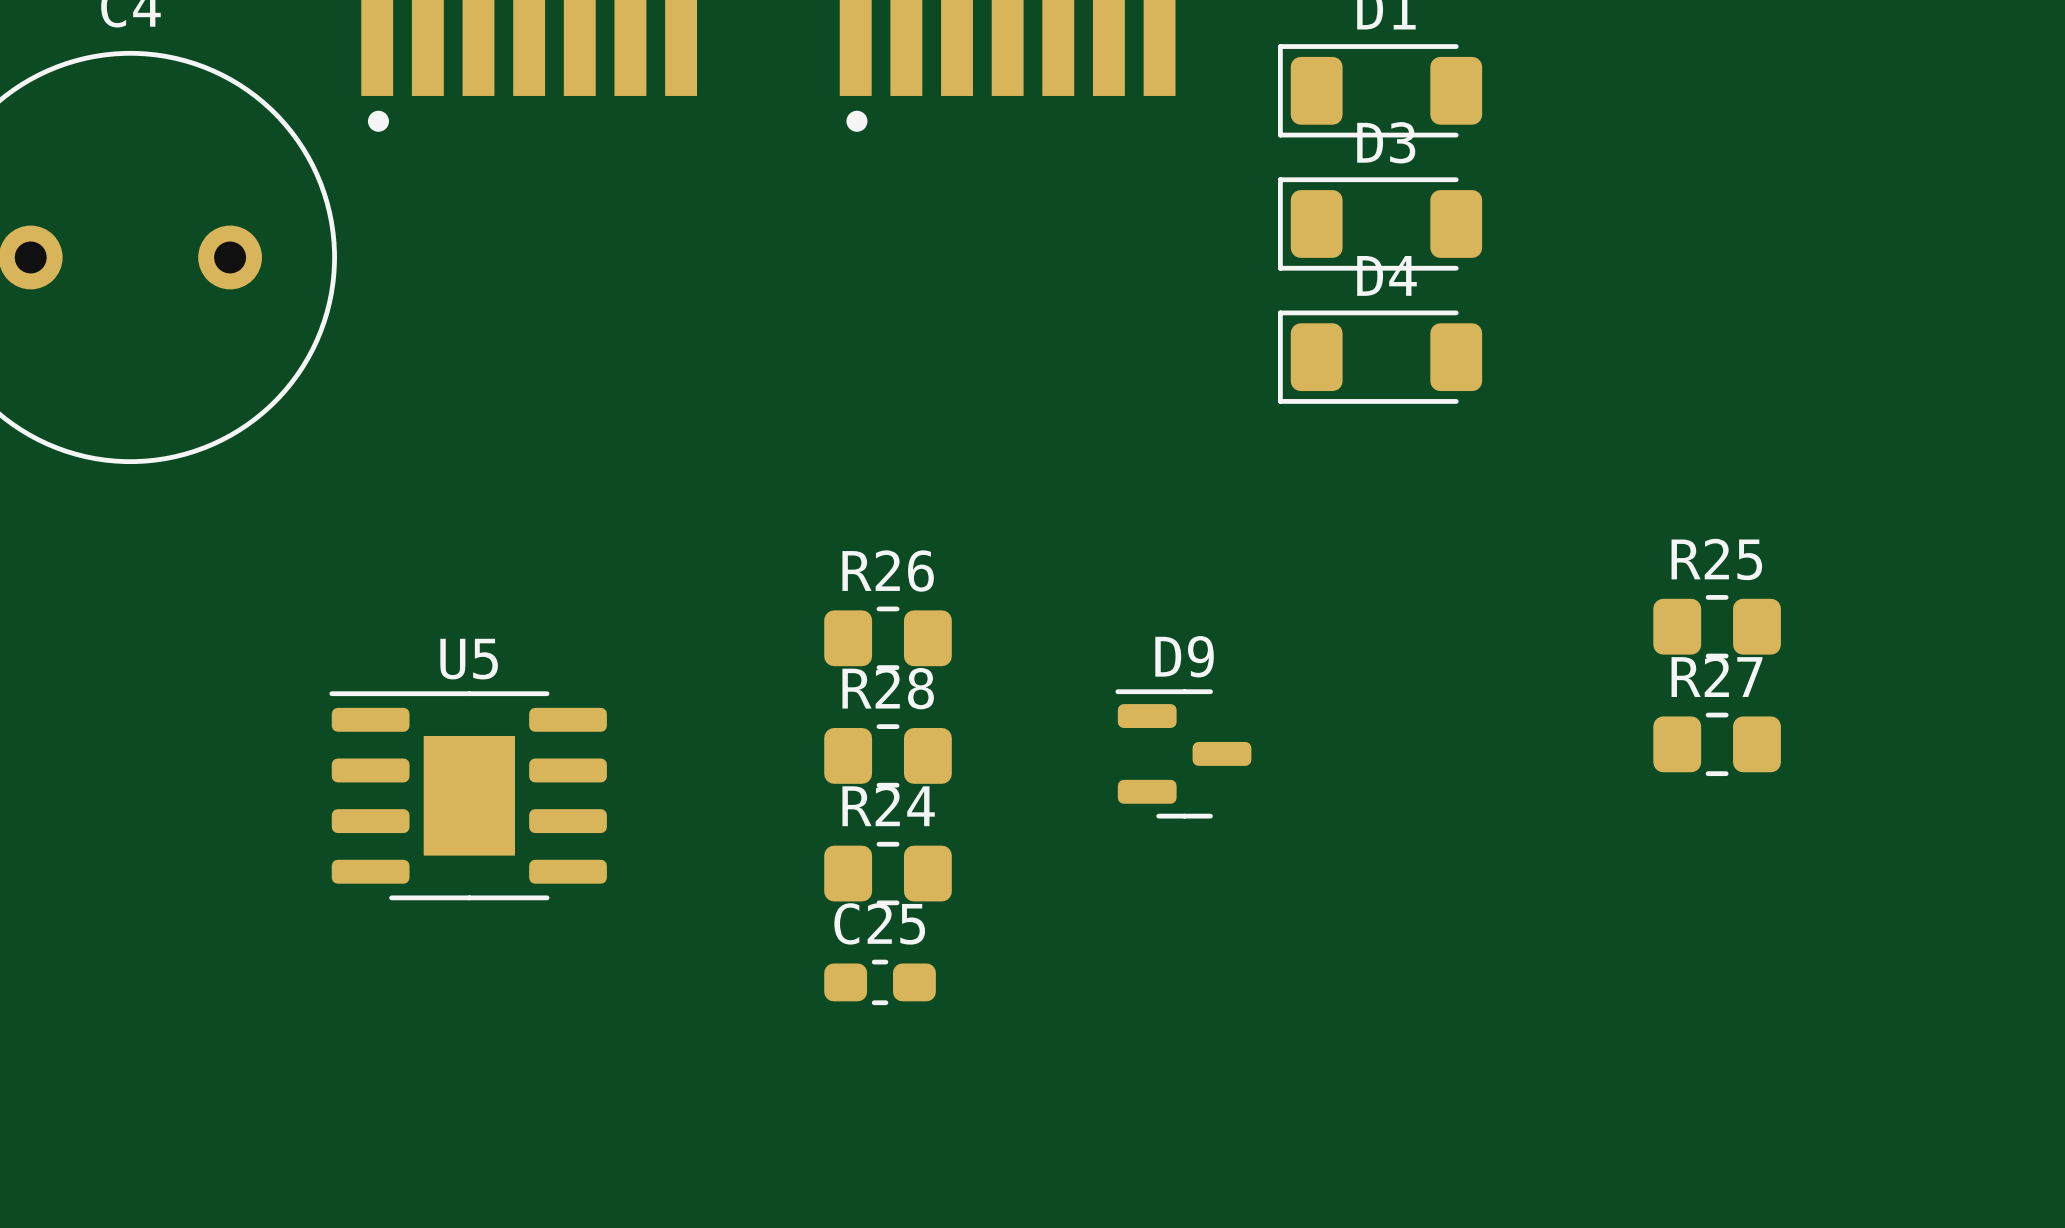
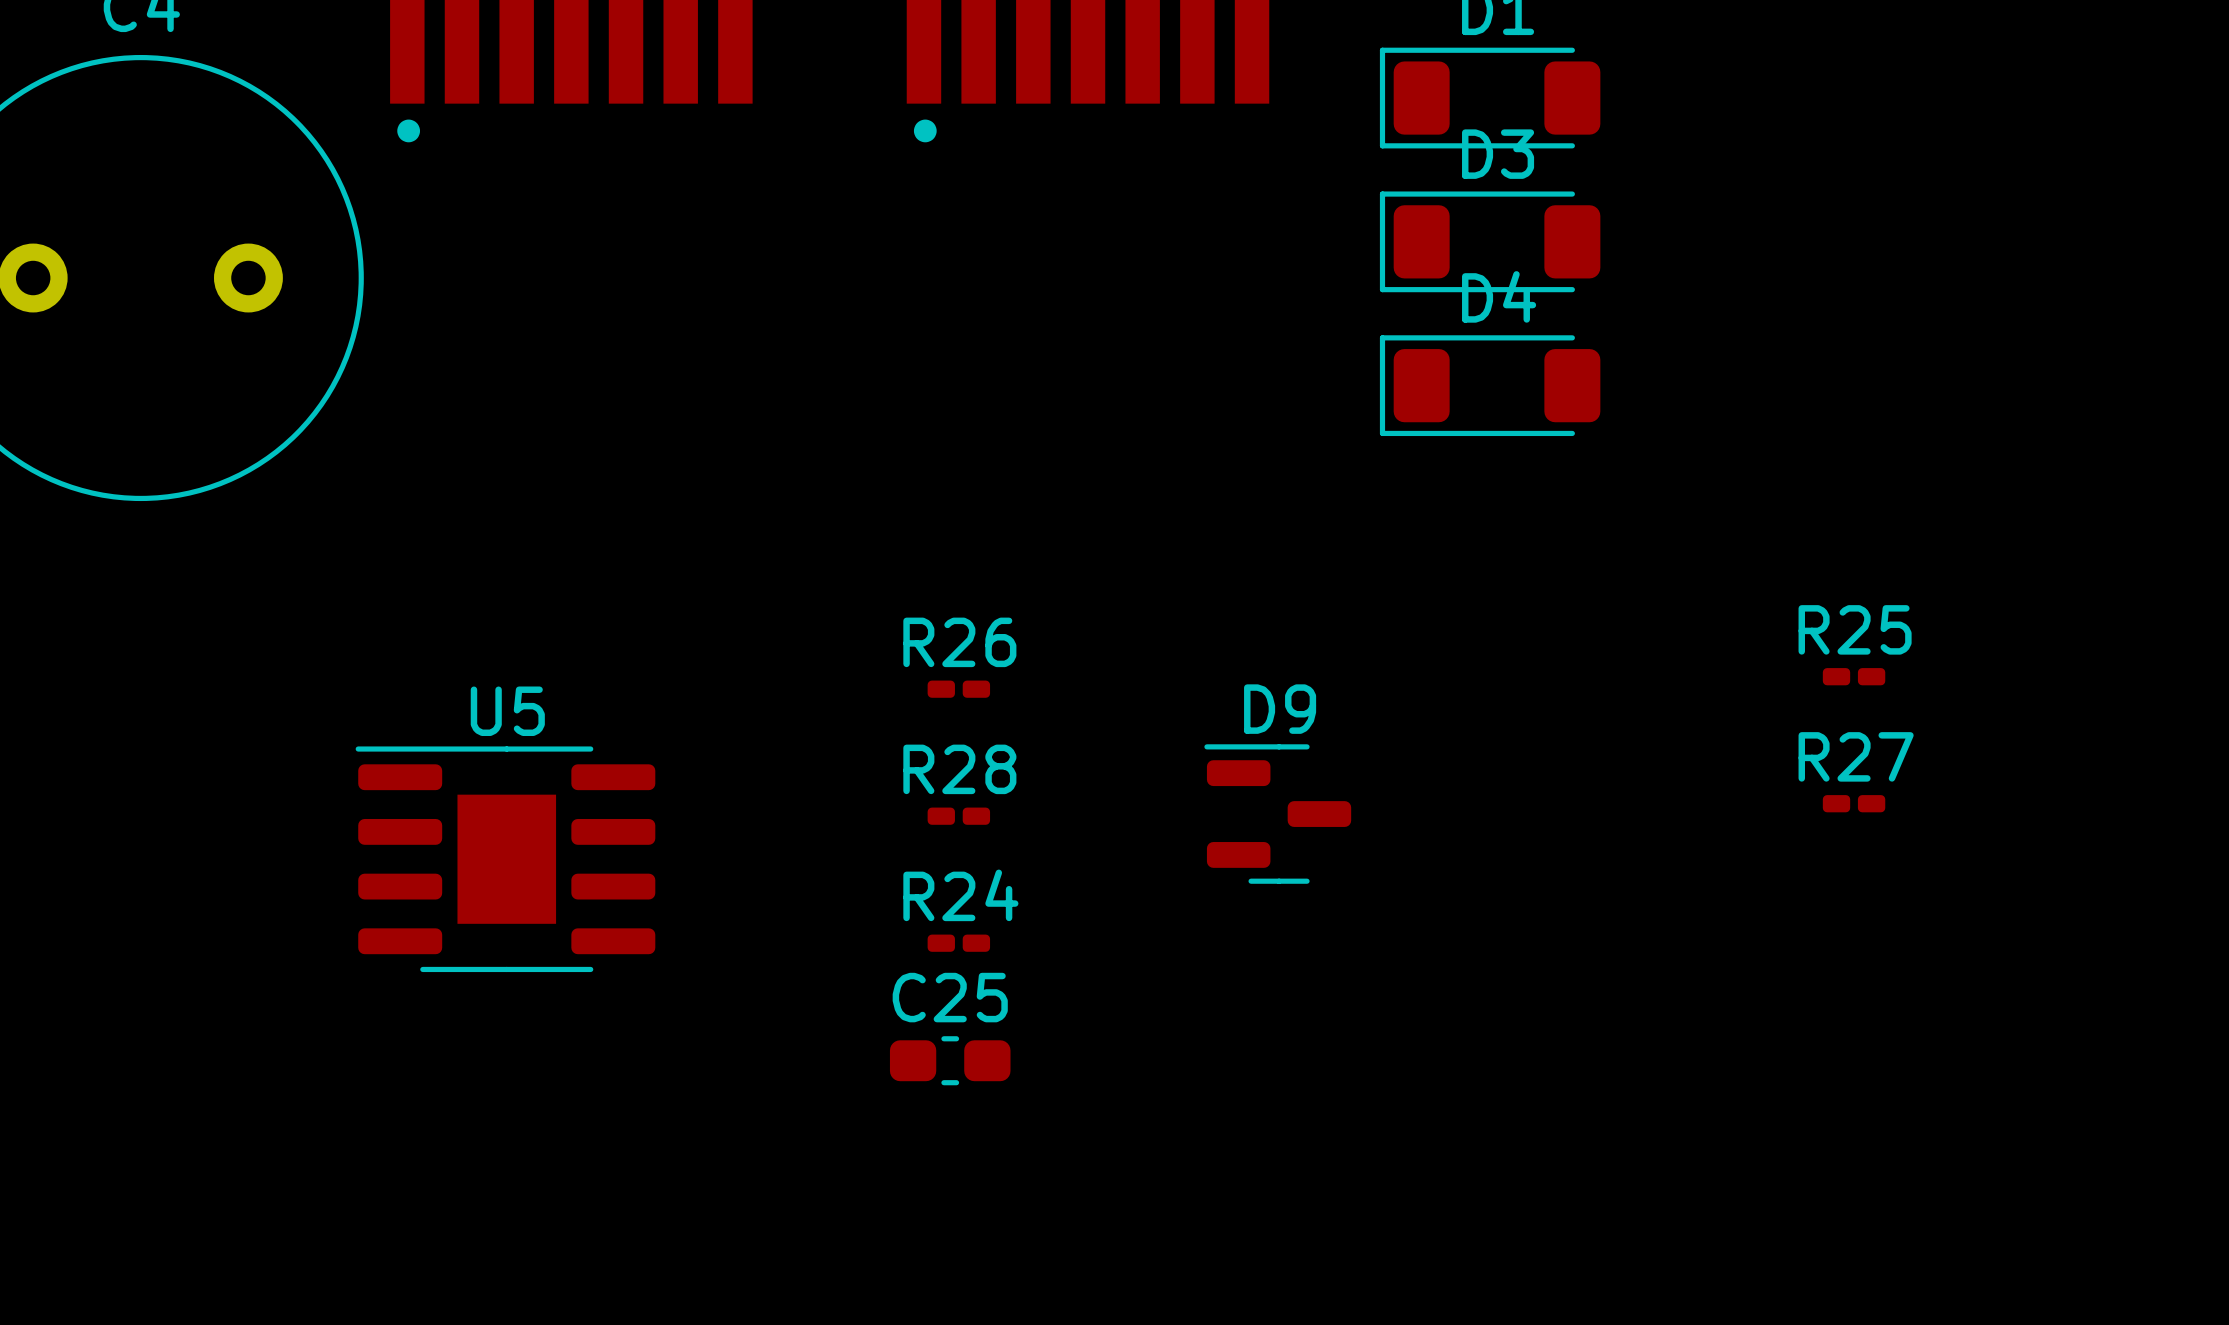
R25 footprint: [1653, 595, 1781, 659] -> [1822, 668, 1886, 686]
R26 footprint: [824, 606, 952, 670] -> [927, 680, 991, 698]
R27 footprint: [1653, 712, 1781, 777] -> [1822, 795, 1886, 813]
R28 footprint: [824, 724, 952, 788] -> [927, 807, 991, 825]
R24 footprint: [824, 841, 952, 906] -> [927, 934, 991, 952]

